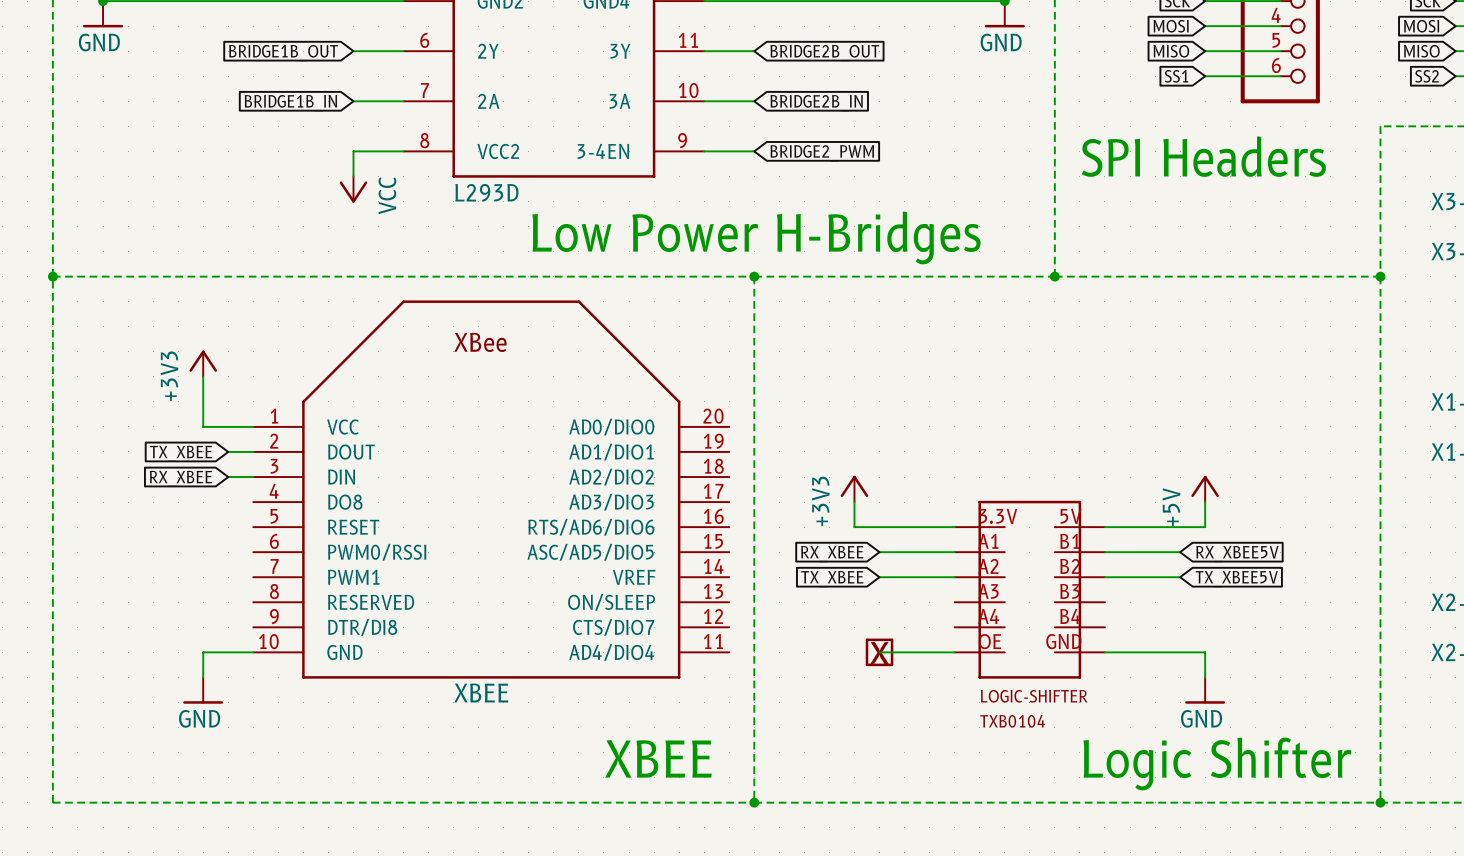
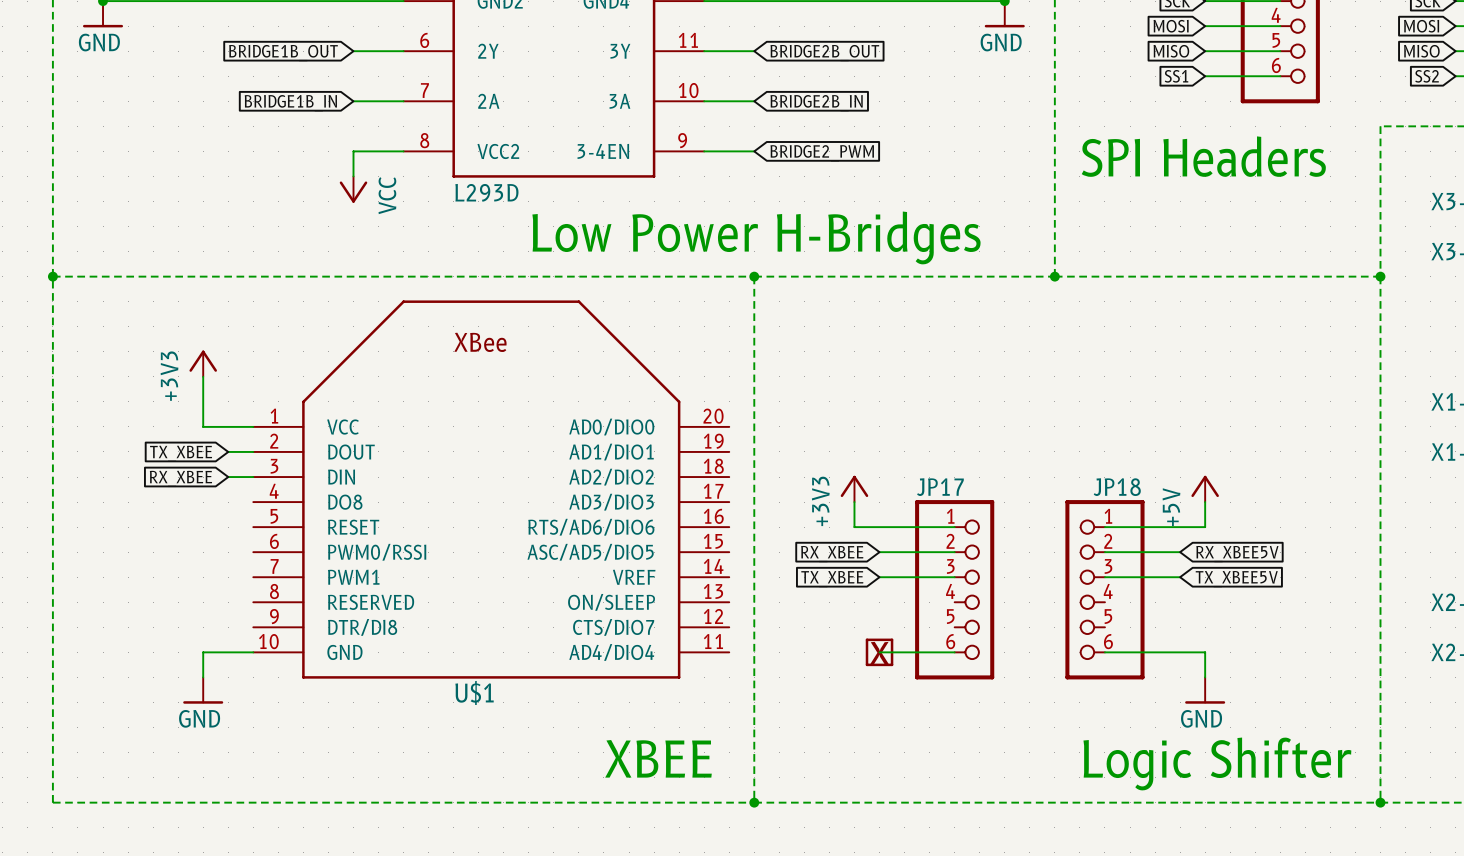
JP17: none -> (954, 589)
LOGIC-SHIFTER: TXB0104 (1029, 589) -> none
JP18: none -> (1104, 589)
XBEE name: XBEE (481, 692) -> U$1 (474, 692)

